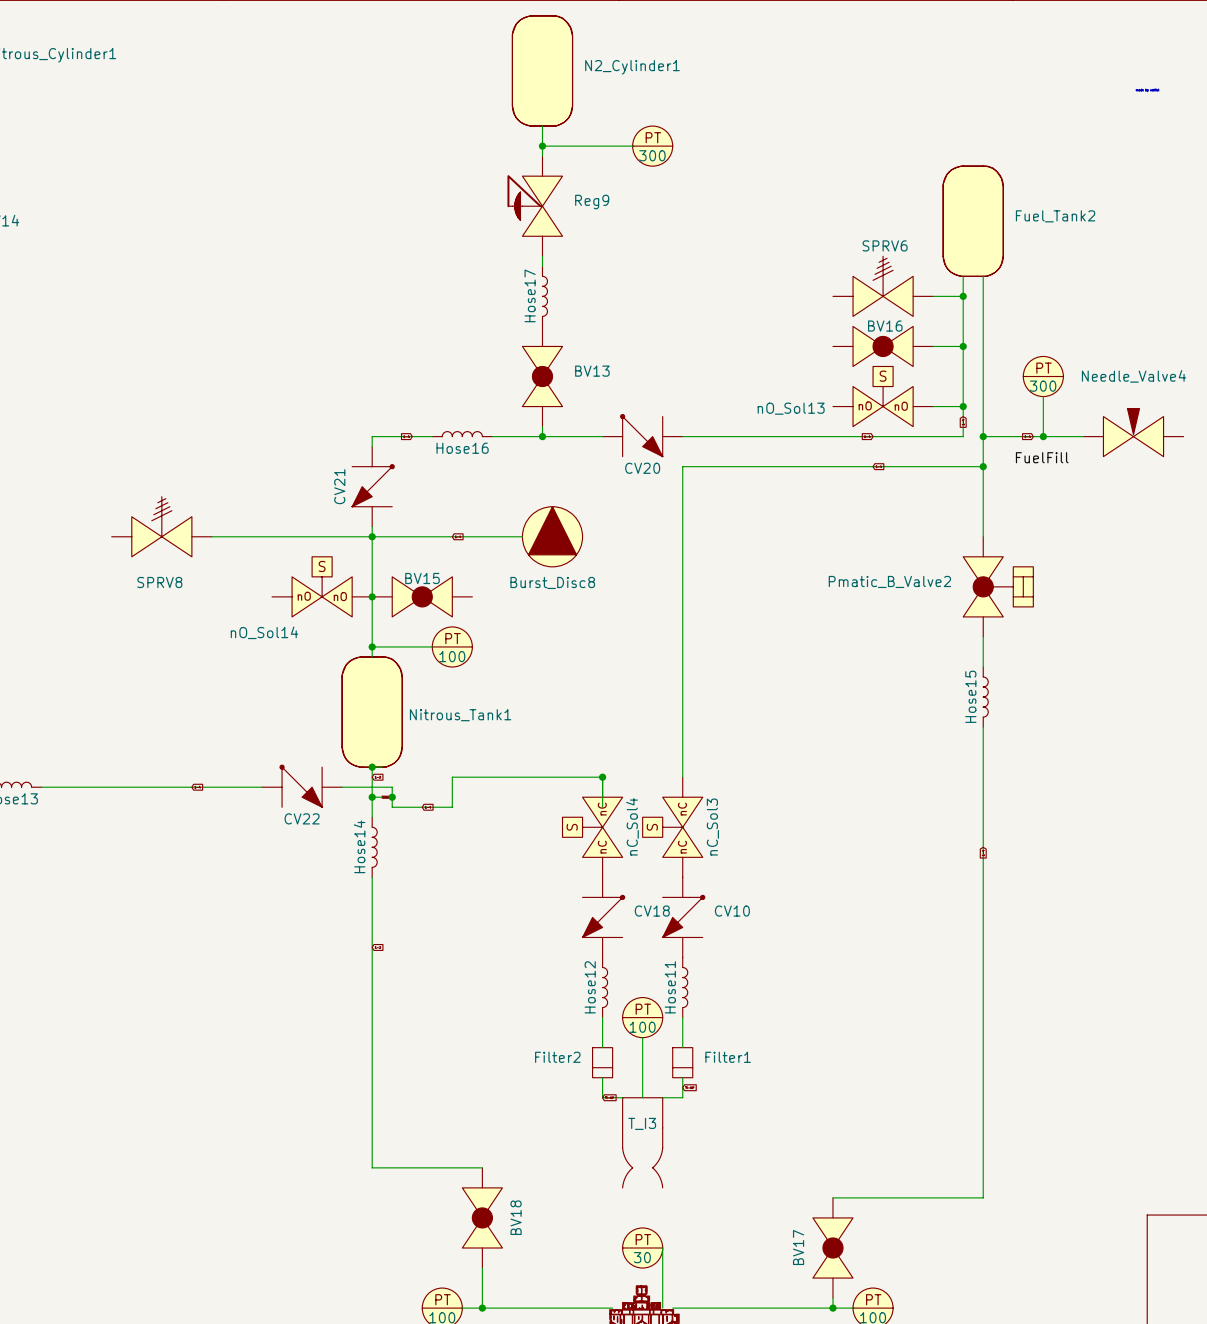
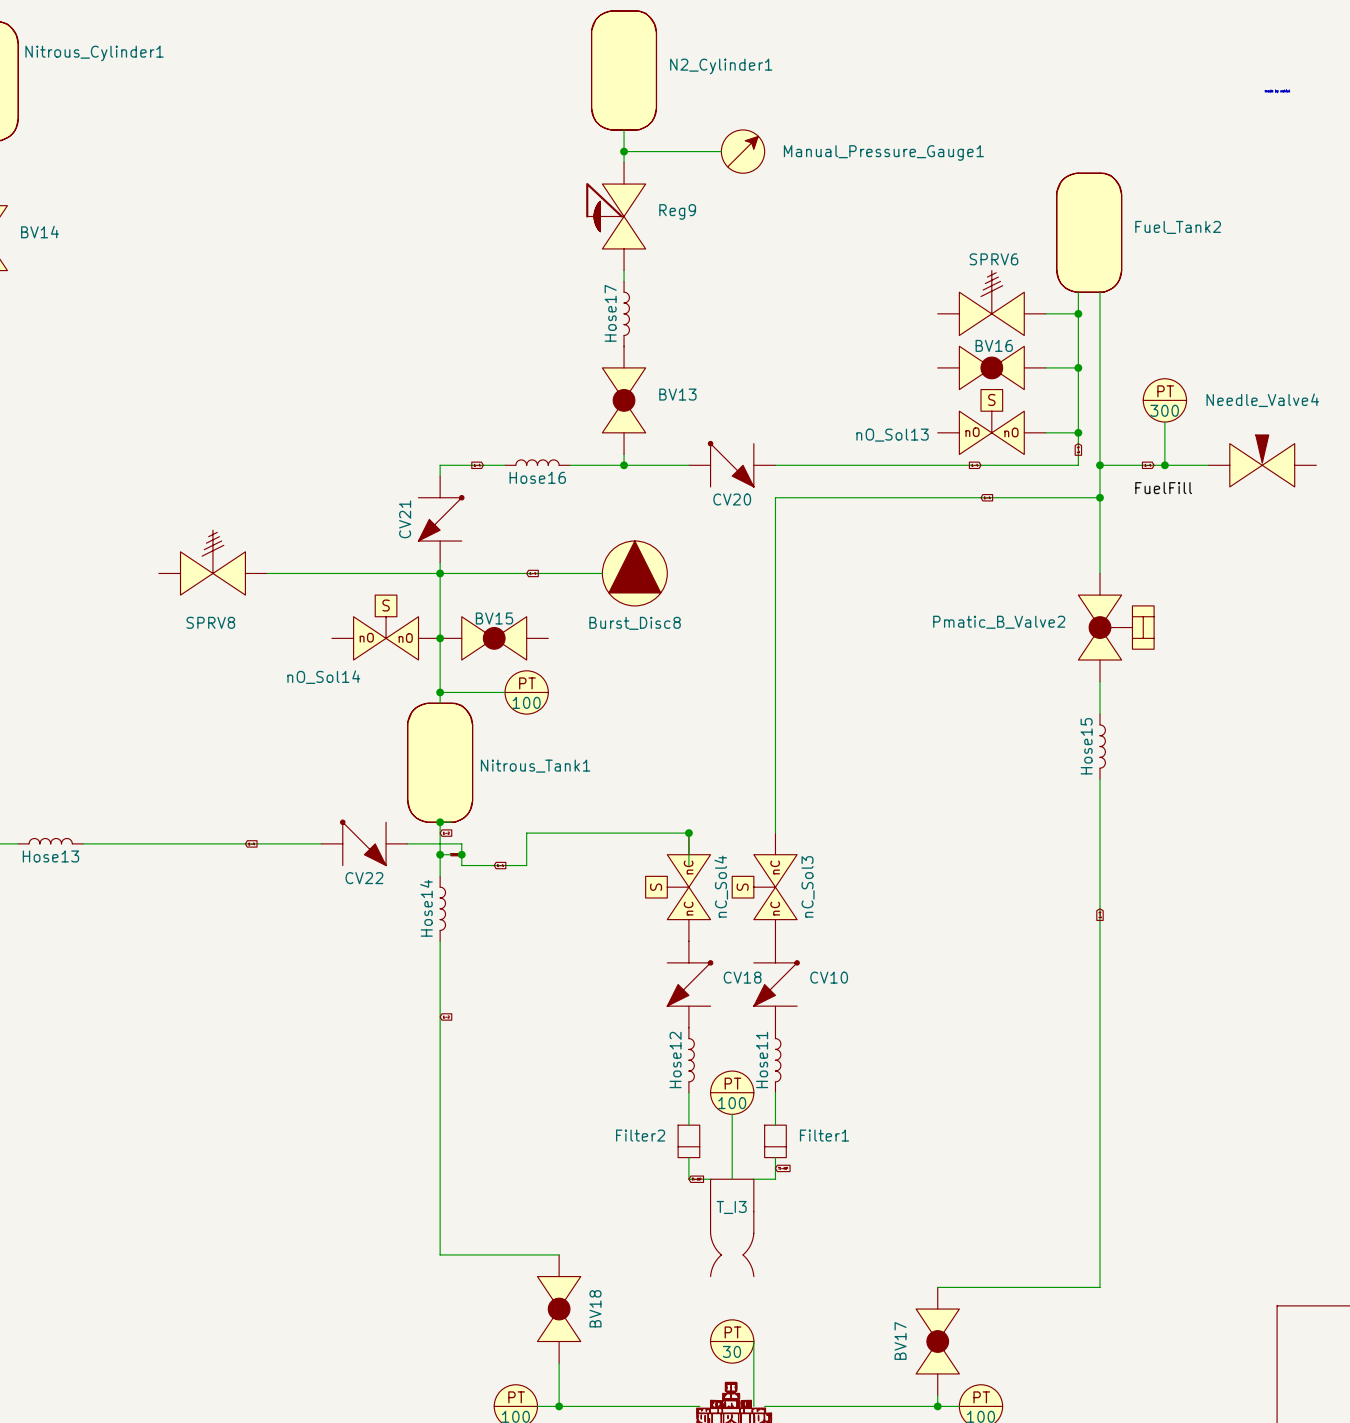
part: 300 (652, 146) -> none
Manual_Pressure_Gauge1: none -> (743, 151)

